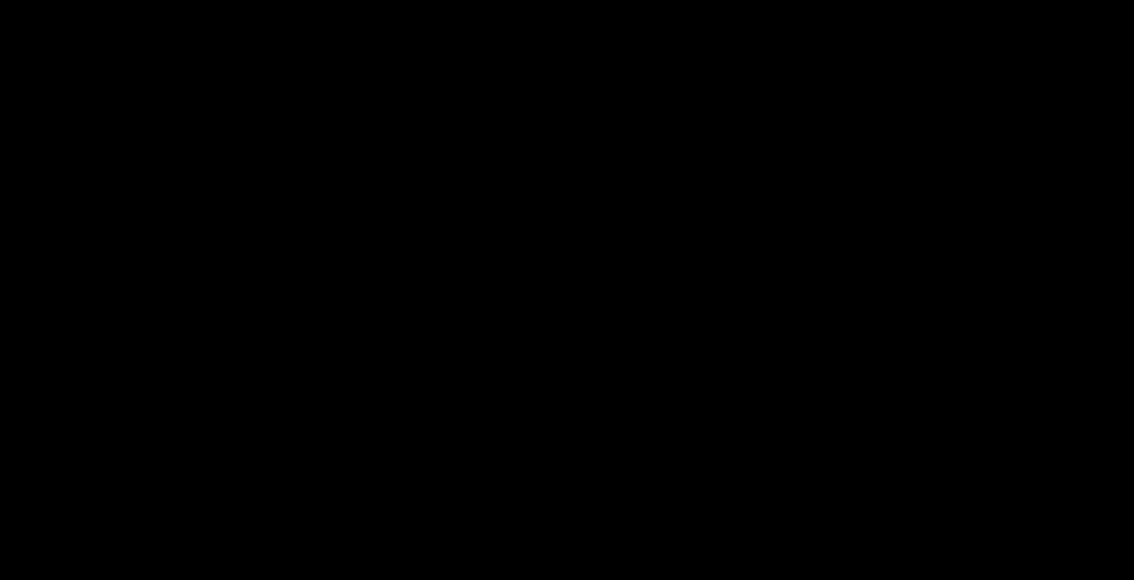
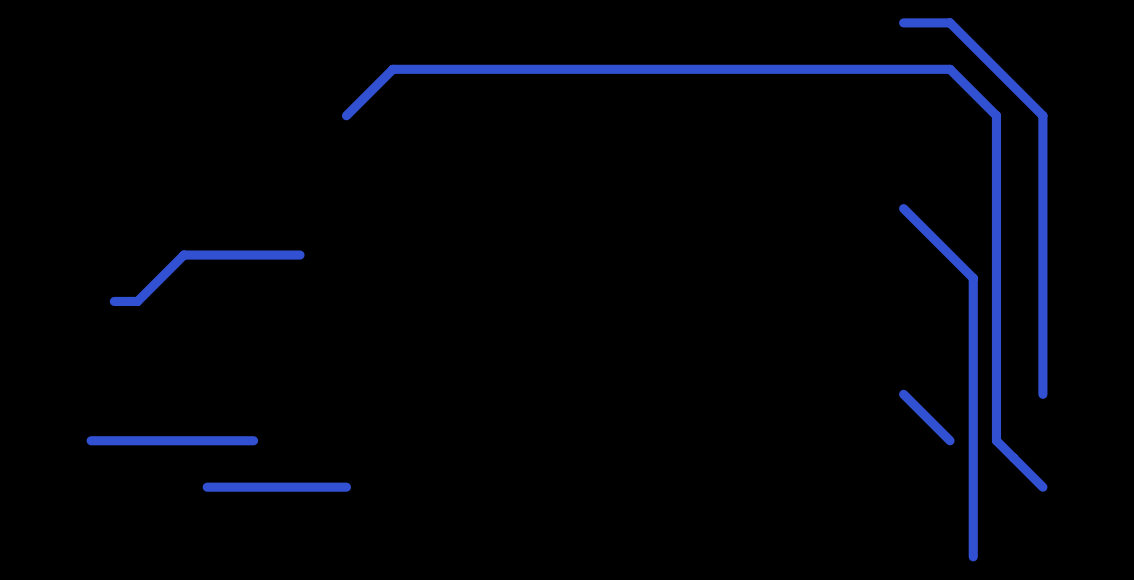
track: none -> (903, 22) (950, 22) (1042, 115) (1042, 394)
track: none -> (346, 115) (392, 69) (950, 69) (996, 115) (996, 440) (1042, 487)
track: none -> (903, 208) (973, 278) (973, 556)
track: none -> (300, 255) (183, 255) (137, 301) (114, 301)
track: none -> (903, 394) (950, 440)
track: none -> (253, 440) (91, 440)
track: none -> (346, 487) (207, 487)

